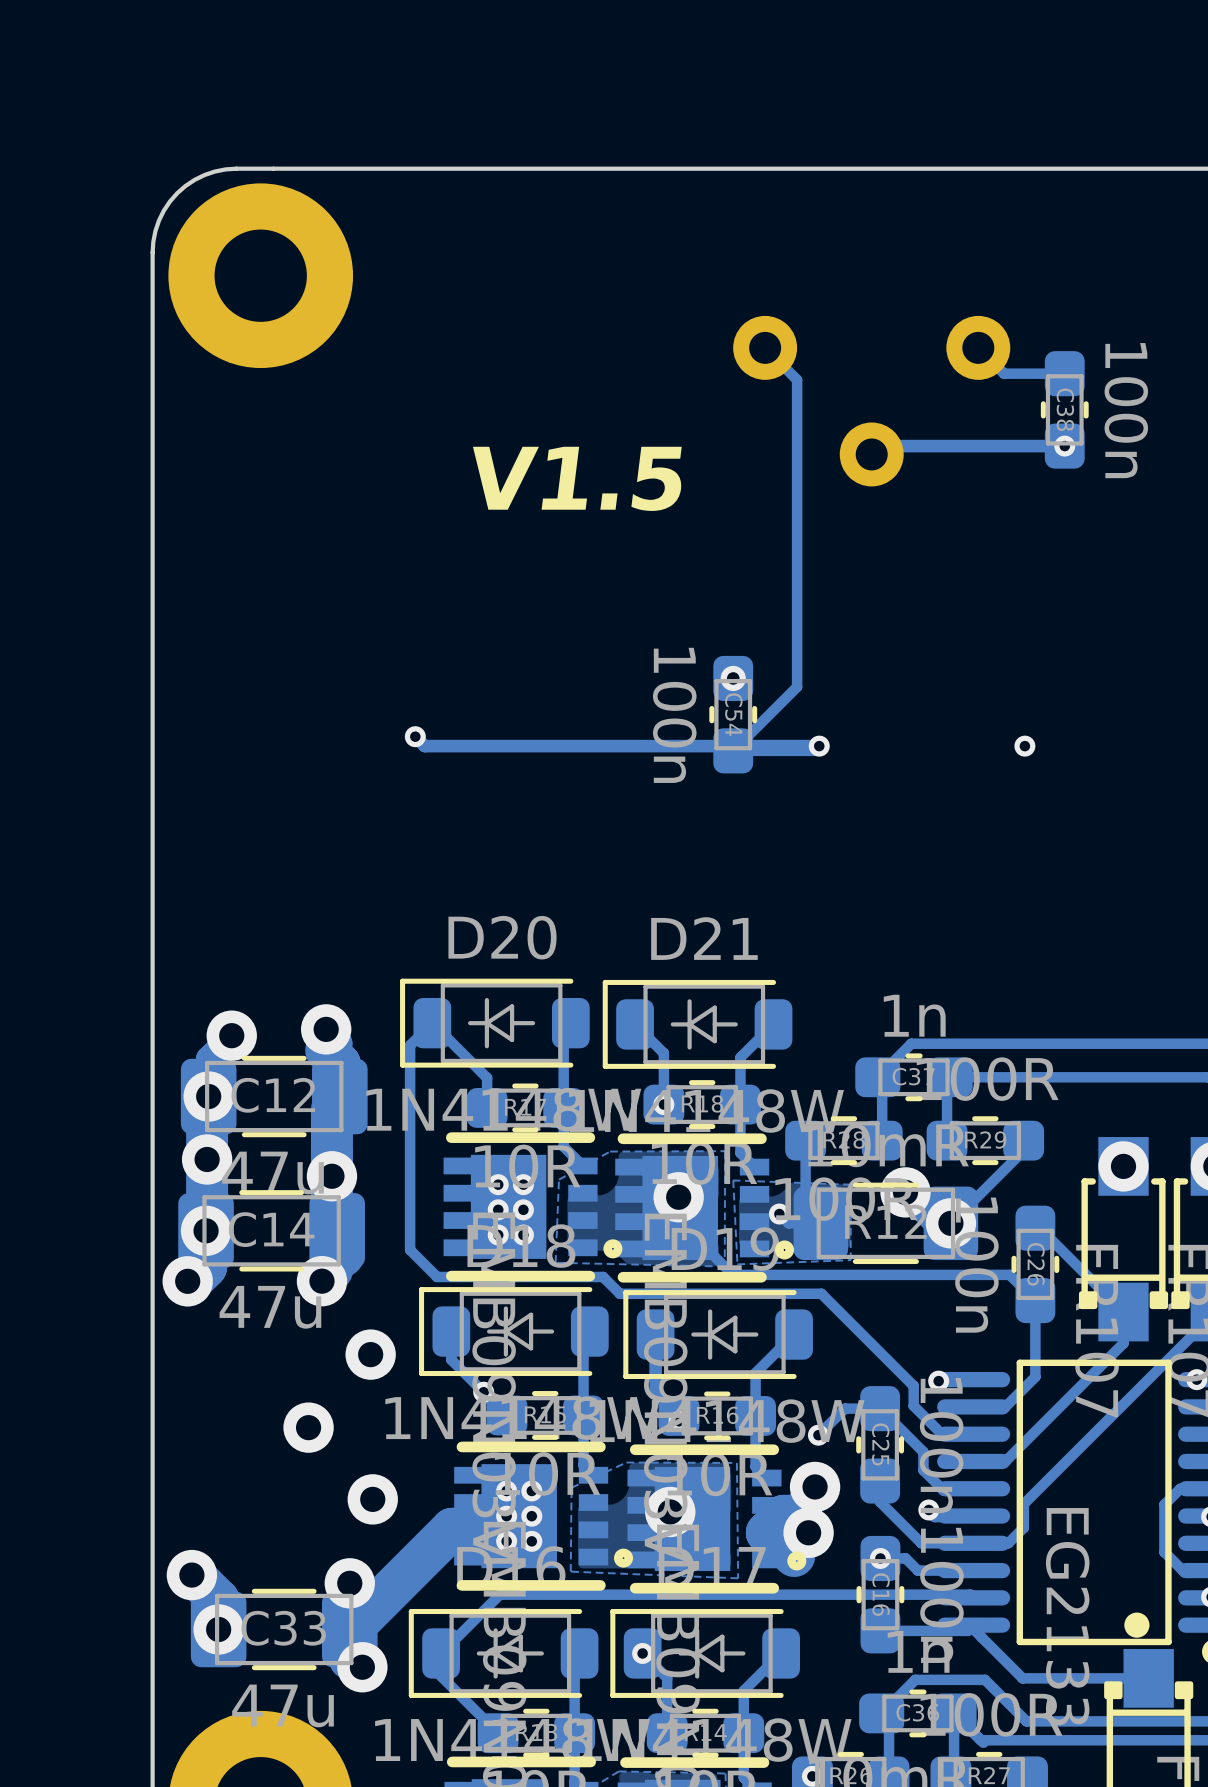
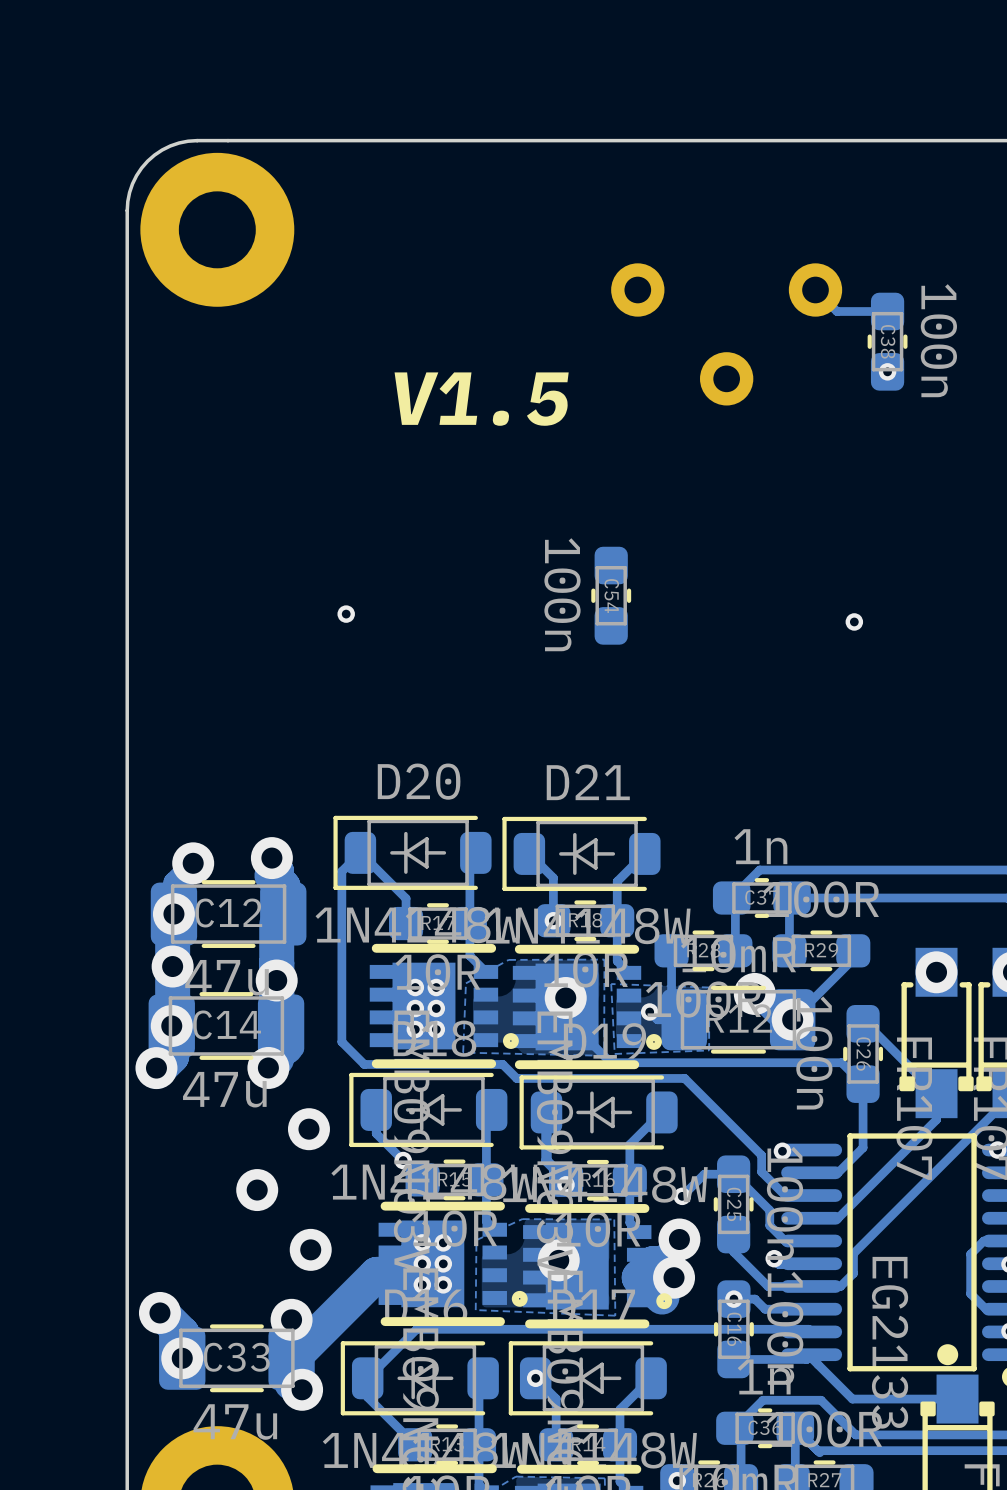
track: (765, 347) (797, 379) (797, 686) (733, 750) (814, 750) (819, 746) (424, 746) (415, 736) -> none
track: (1064, 446) (880, 446) (871, 454) -> none
via: (733, 678) -> none
via: (819, 746) -> none

